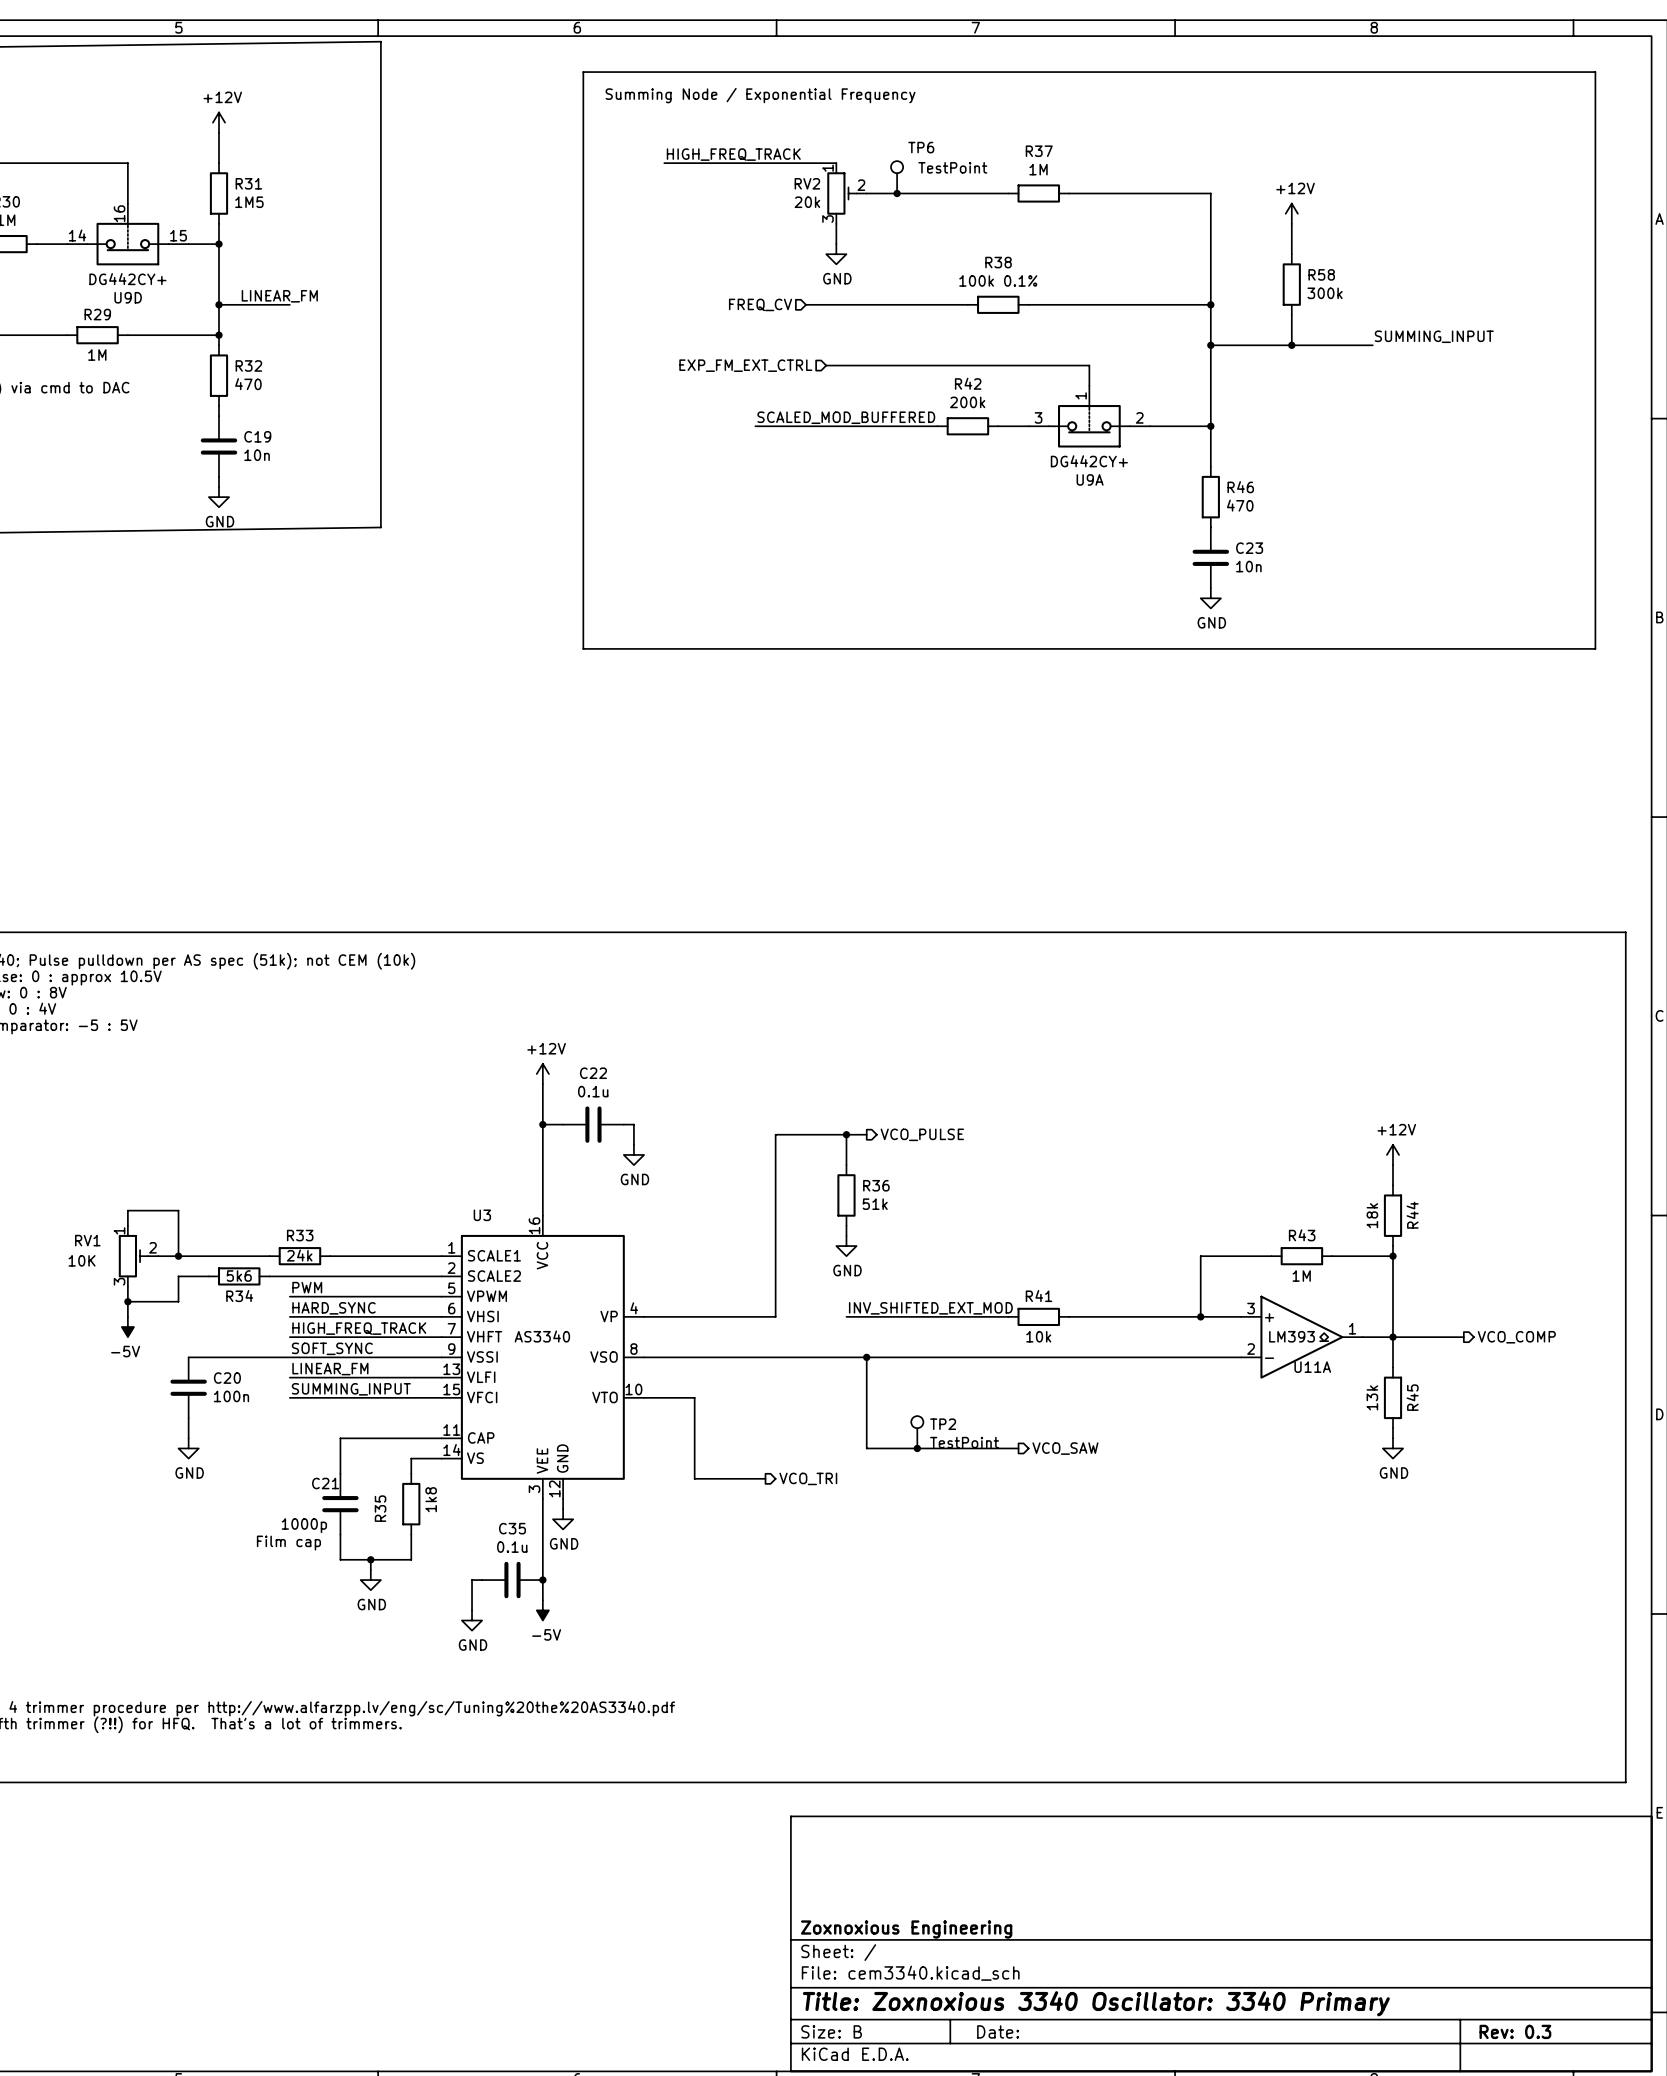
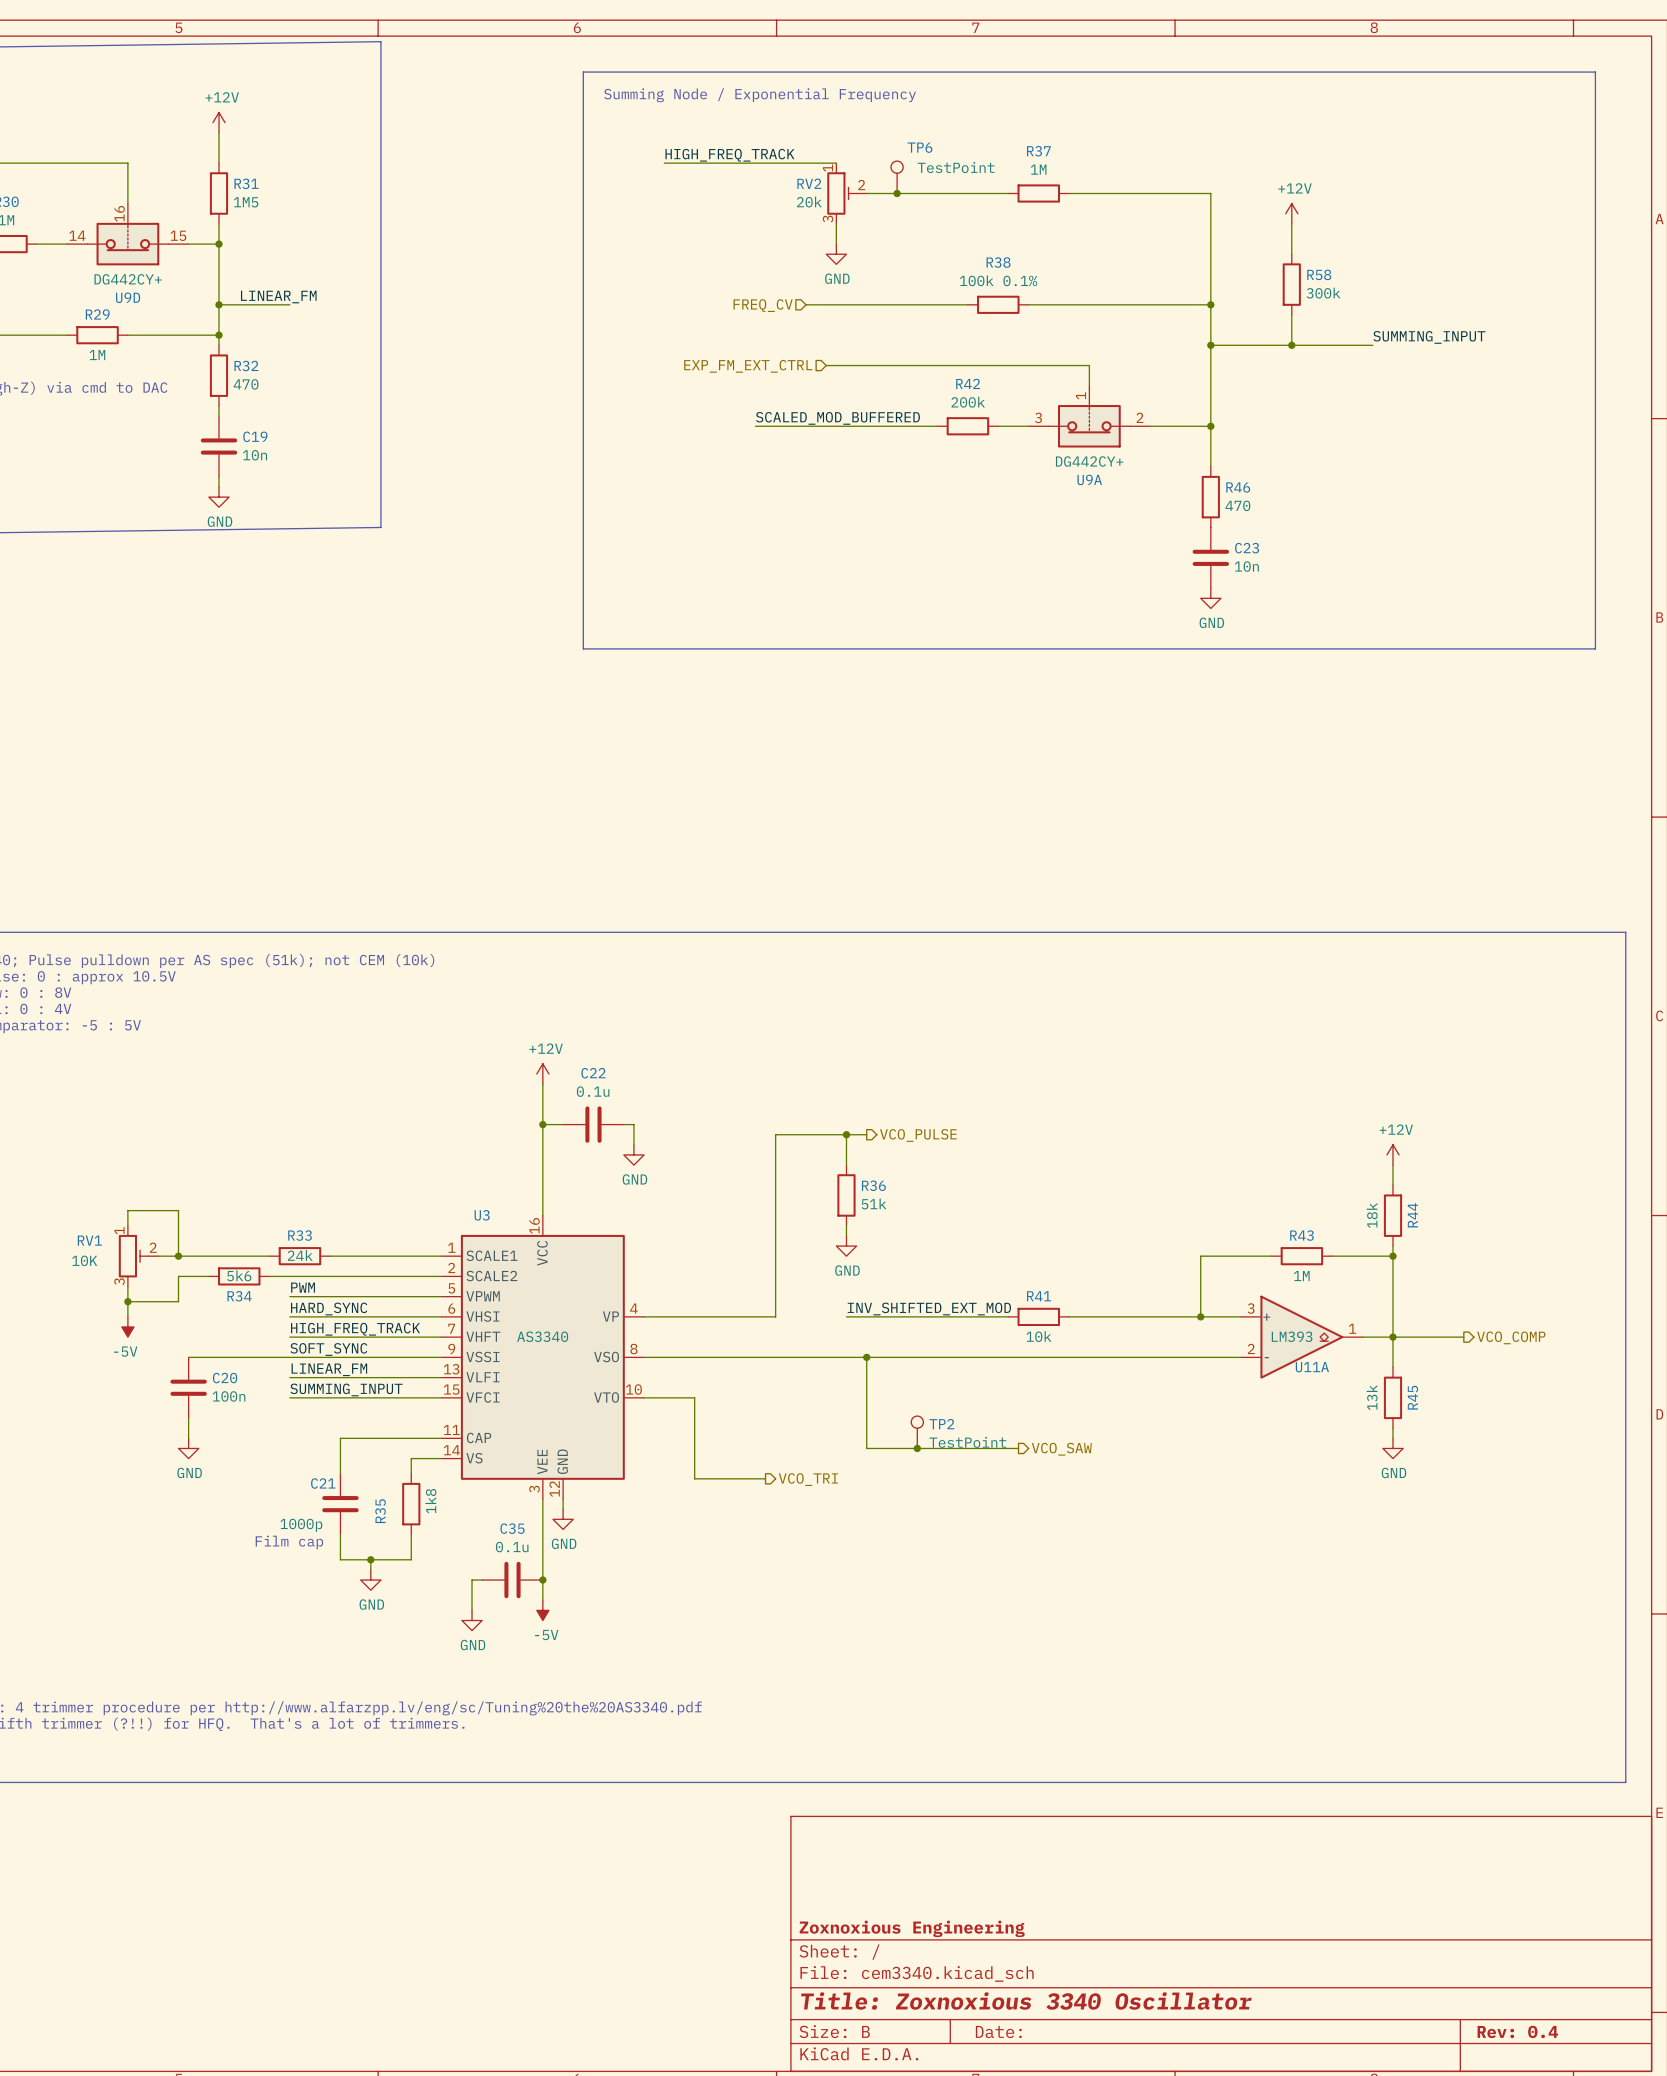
title block: Title: Zoxnoxious 3340 Oscillator: 3340 Primary (1096, 2003) -> Title: Zoxnoxious 3340 Oscillator (1026, 2001)
title block: Rev: 0.3 (1515, 2031) -> Rev: 0.4 (1517, 2031)

